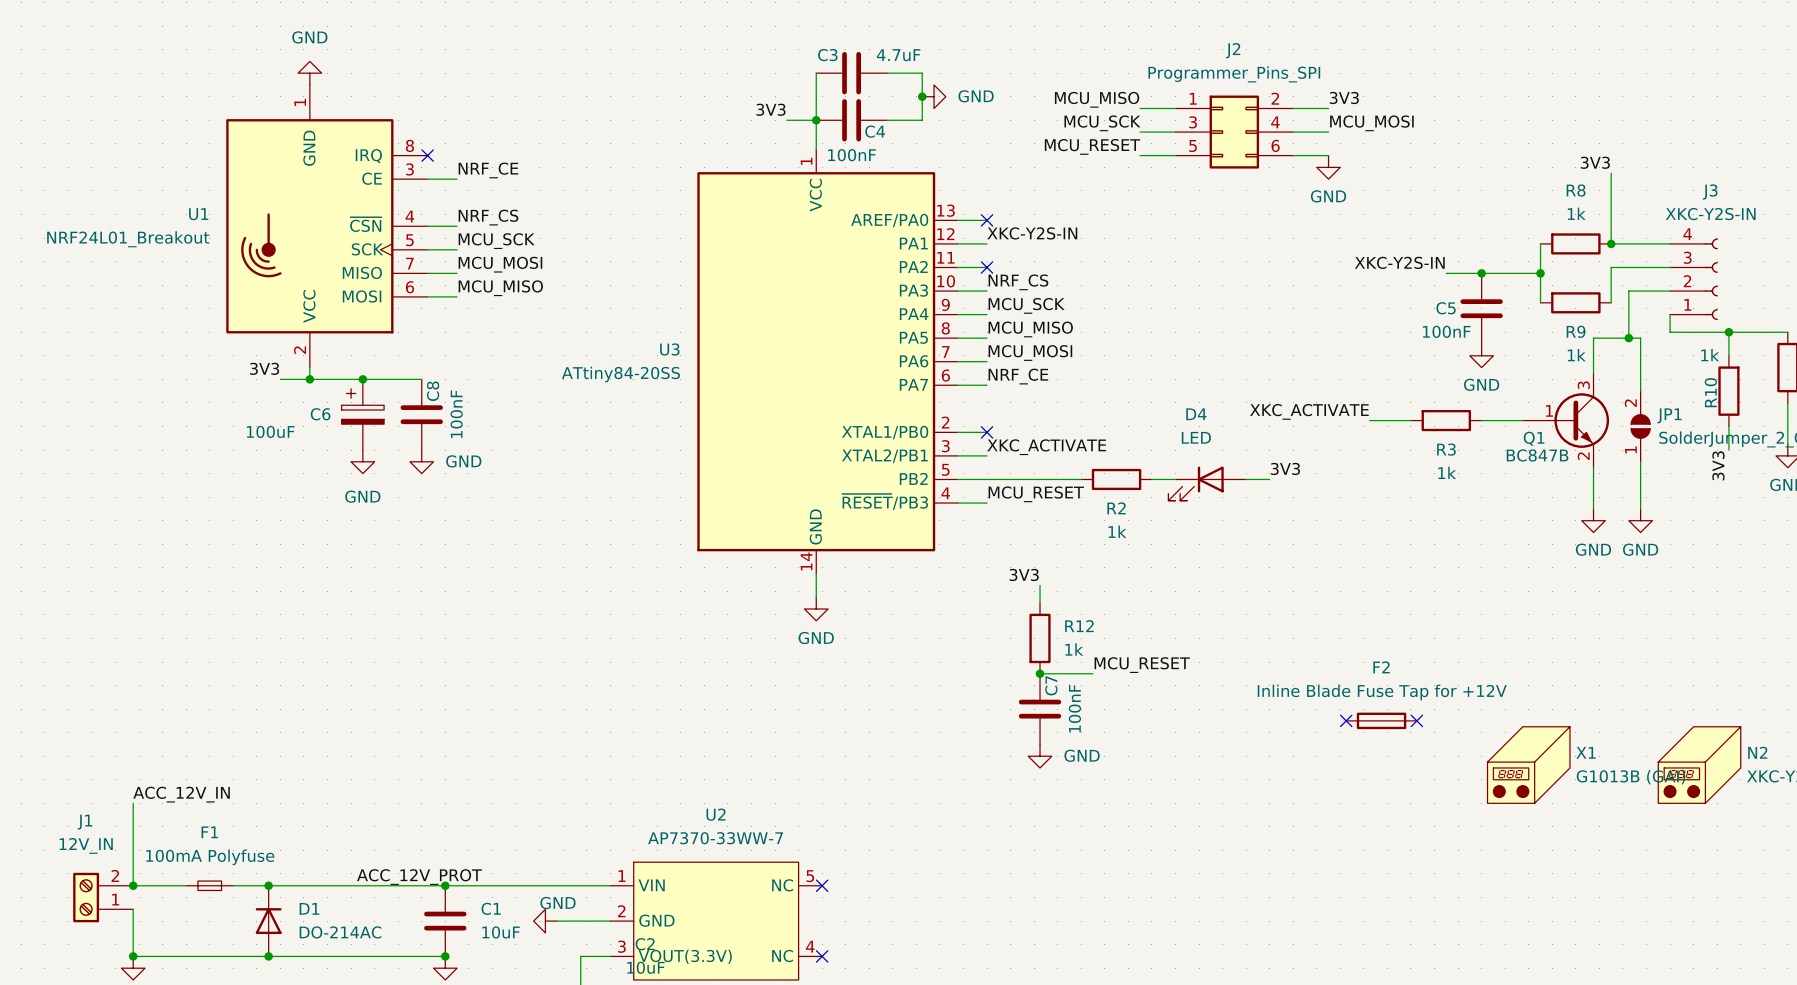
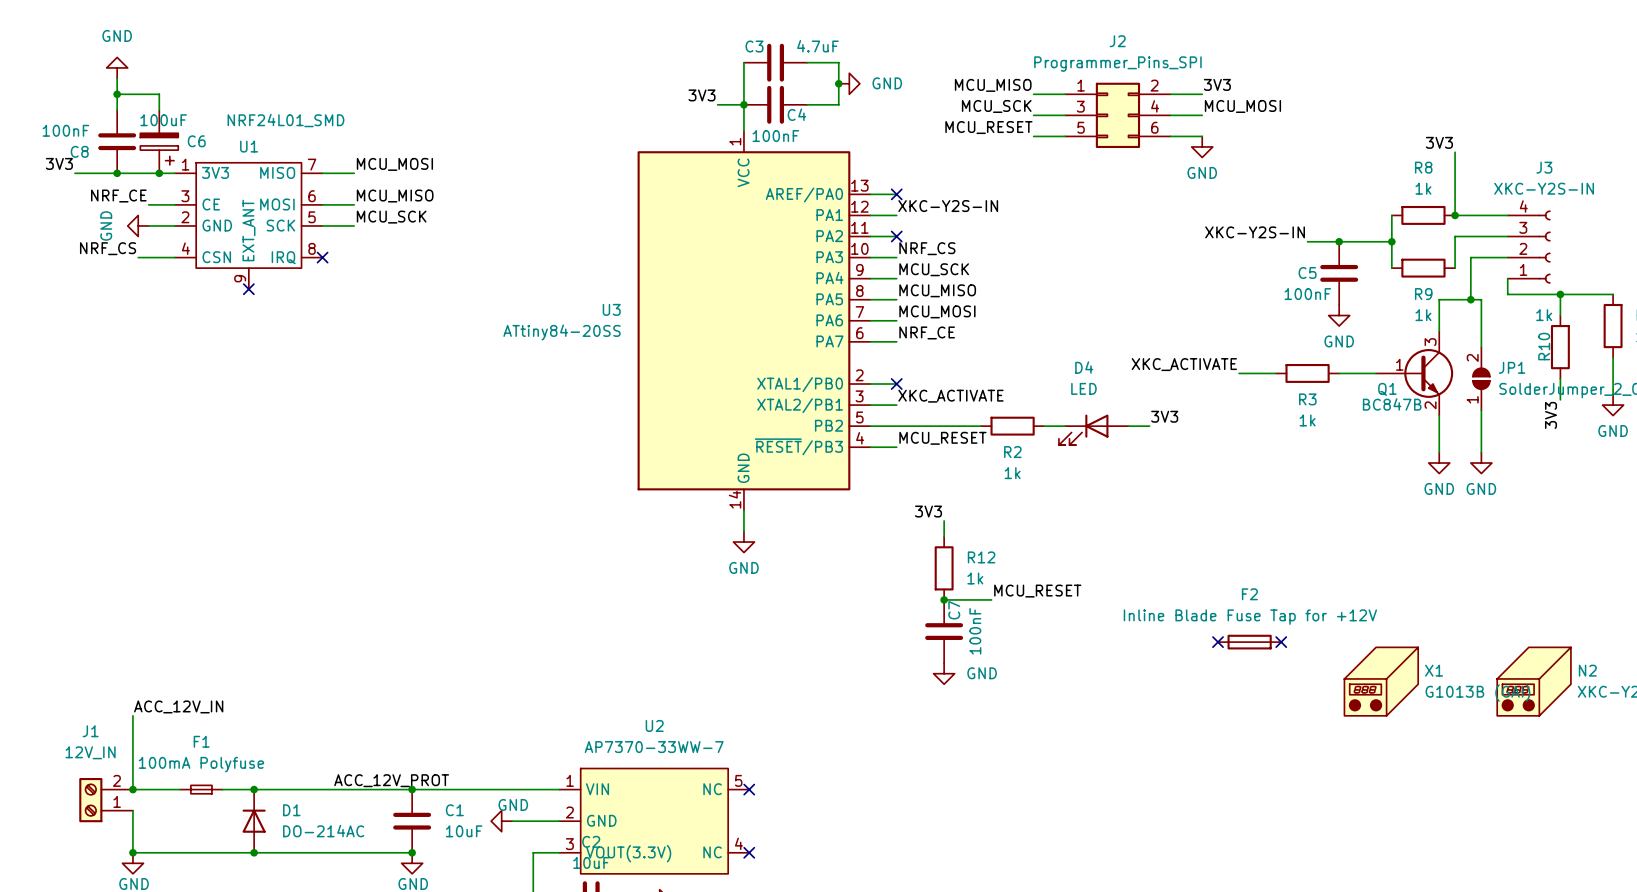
power symbol: GND (309, 73) -> none
power symbol: none -> GND (117, 67)
U1 symbol: [226, 84, 428, 368] -> [175, 162, 323, 290]
wire: none -> (117, 78) (117, 110)
wire: none -> (117, 94) (159, 94) (159, 110)
junction: none -> (117, 94)
no-connect mark: (427, 155) -> none
label: NRF_CE (488, 170) -> none
wire: (427, 179) (457, 179) -> none
label: none -> 3V3 (59, 163)
wire: none -> (75, 173) (175, 173)
junction: none -> (117, 173)
junction: none -> (159, 173)
U1 name position: U1 (198, 214) -> U1 (249, 146)
label: NRF_CS (488, 217) -> none
label: none -> NRF_CE (118, 196)
wire: (427, 226) (457, 226) -> none
wire: none -> (148, 204) (175, 204)
U1 value: NRF24L01_Breakout (128, 239) -> NRF24L01_SMD (285, 120)
label position: MCU_SCK (496, 241) -> MCU_SCK (391, 217)
power symbol: none -> GND (138, 225)
wire: none -> (148, 225) (175, 225)
label position: MCU_MOSI (500, 264) -> MCU_MOSI (394, 164)
wire: (427, 273) (457, 273) -> none
label: none -> NRF_CS (108, 248)
label position: MCU_MISO (500, 288) -> MCU_MISO (395, 196)
wire: none -> (138, 257) (175, 257)
no-connect mark: none -> (322, 257)
wire: (427, 296) (457, 296) -> none
no-connect mark: none -> (248, 289)
wire: (309, 367) (309, 379) -> none
label: 3V3 (264, 368) -> none
wire: (280, 379) (421, 379) -> none
junction: (309, 379) -> none
junction: (362, 379) -> none
C8 name rotation: 0° (433, 391) -> 90° clockwise (79, 151)
C8 name position: C8 (433, 391) -> C8 (79, 151)
C6 rotation: 0° (362, 406) -> 180° (159, 149)
C6 position: (362, 414) -> (159, 141)
C8 position: (421, 414) -> (117, 141)
C8 value rotation: 0° (456, 414) -> 90° clockwise (65, 130)
C8 value position: 100nF (456, 414) -> 100nF (65, 130)
C6 value position: 100uF (270, 431) -> 100uF (163, 120)
power symbol: GND (362, 461) -> none
power symbol: GND (421, 461) -> none

